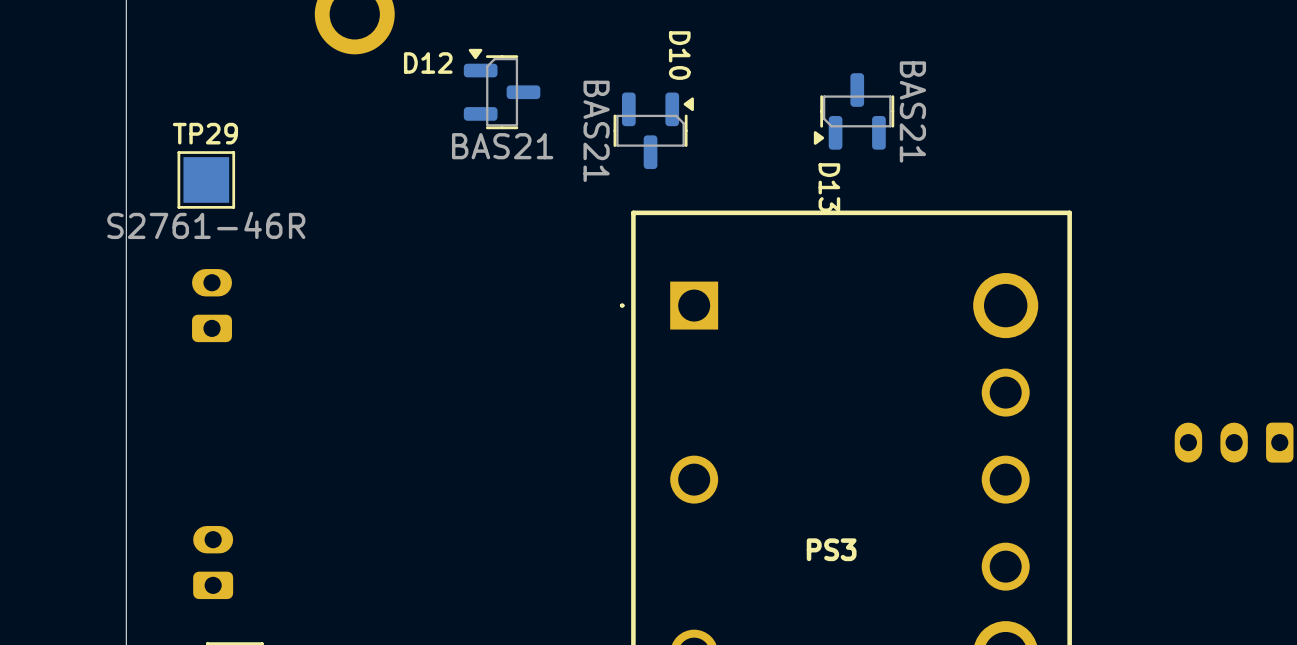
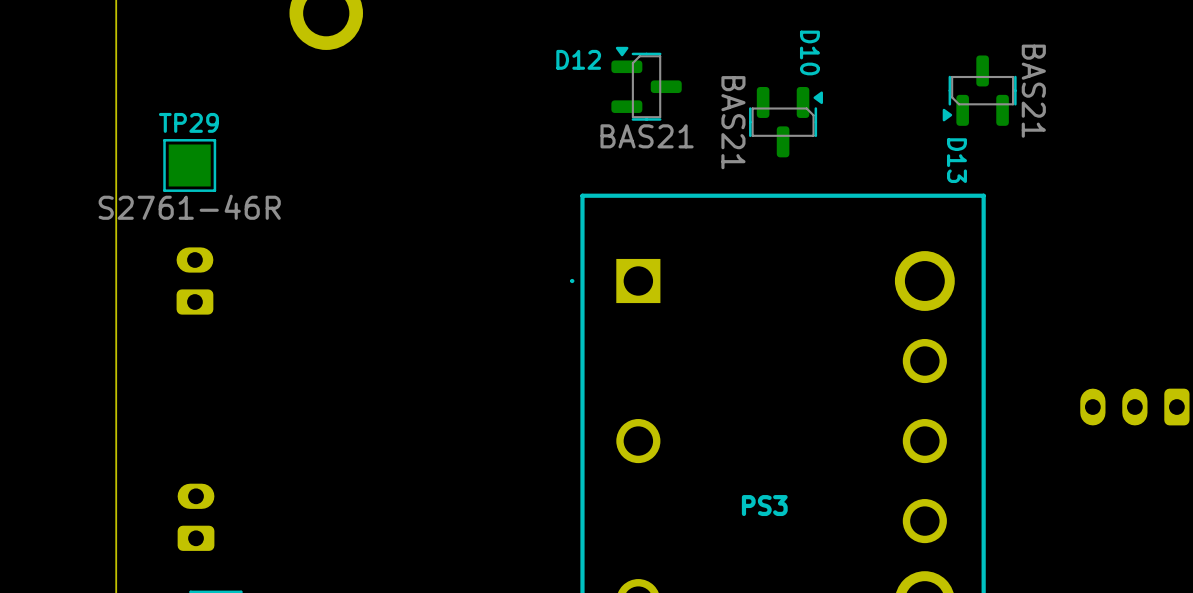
D12 position: (502, 89) -> (646, 83)
D13 position: (854, 111) -> (979, 90)
D10 position: (653, 130) -> (786, 122)

